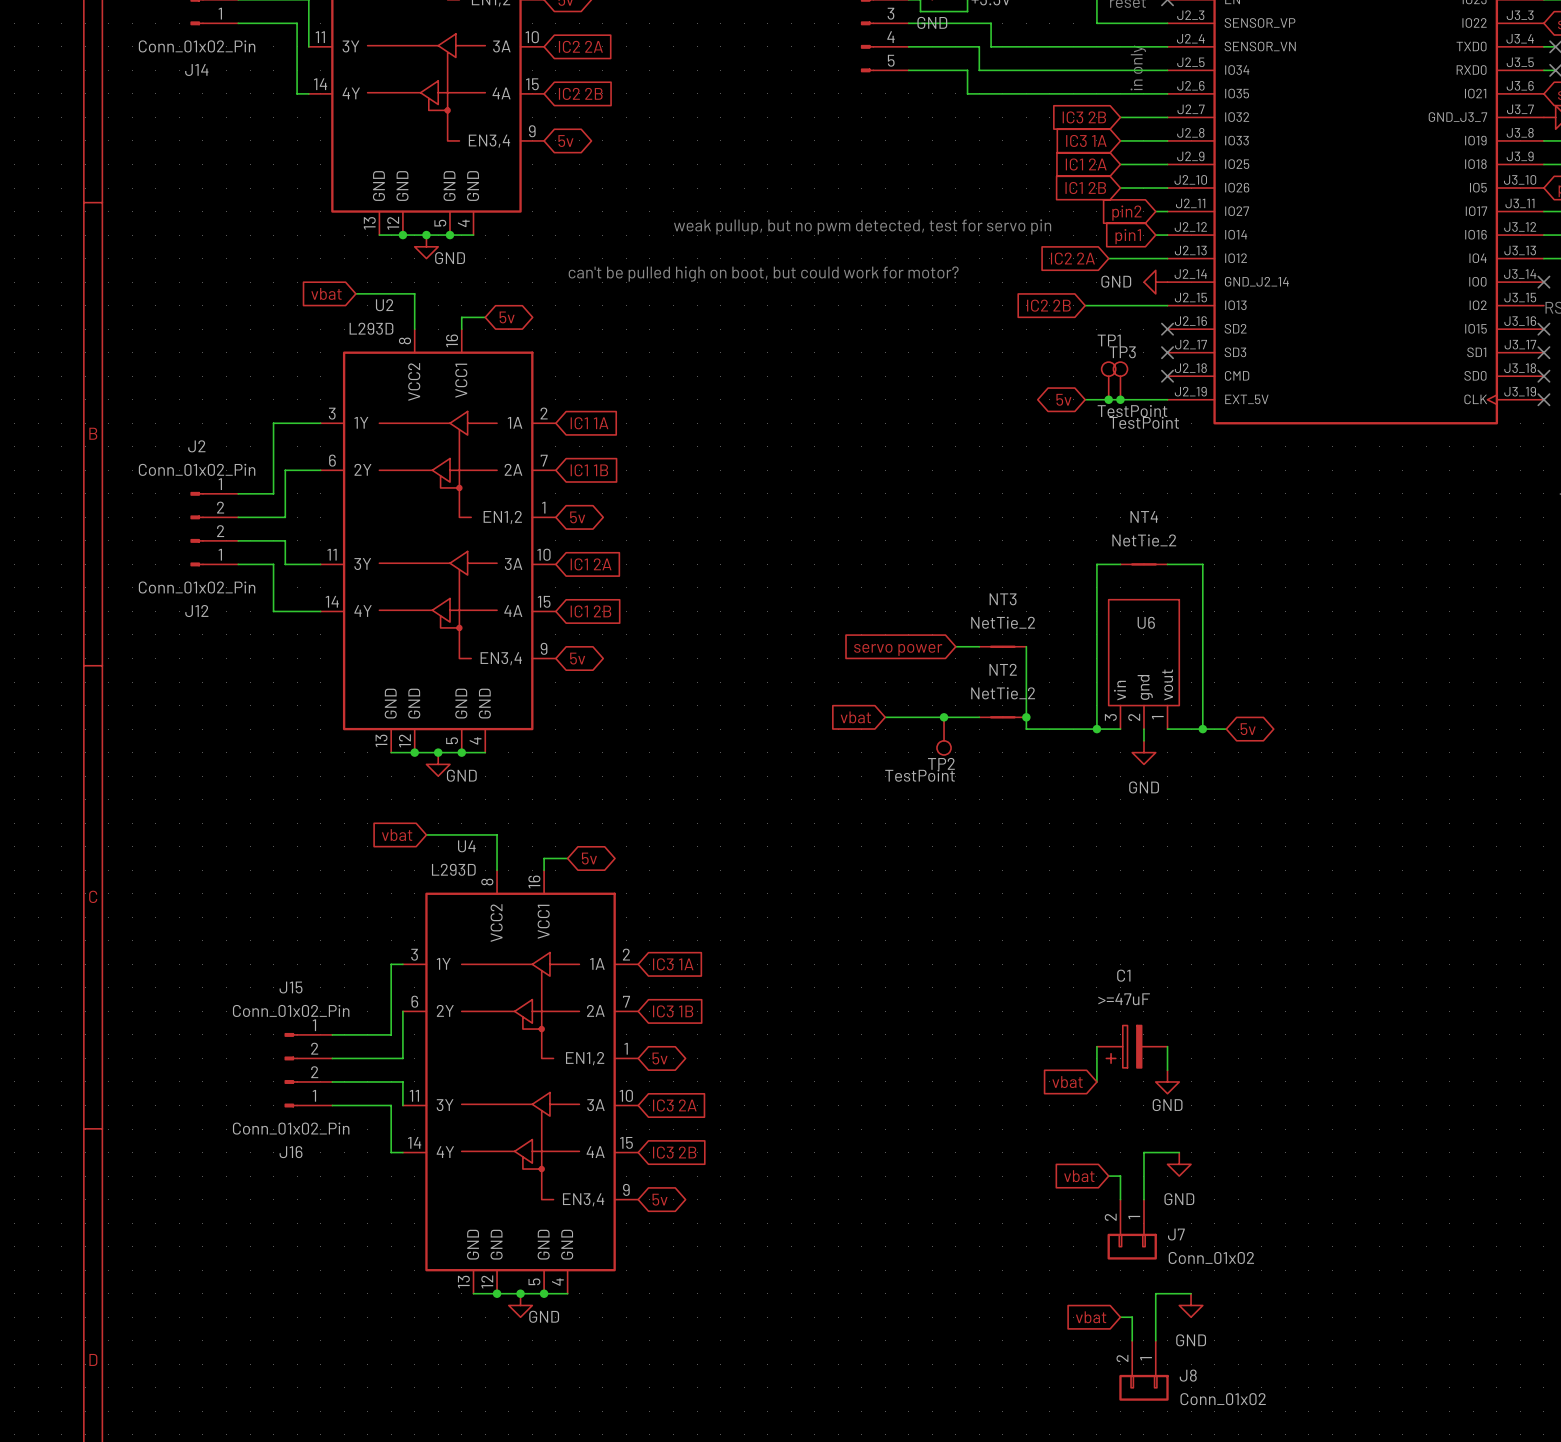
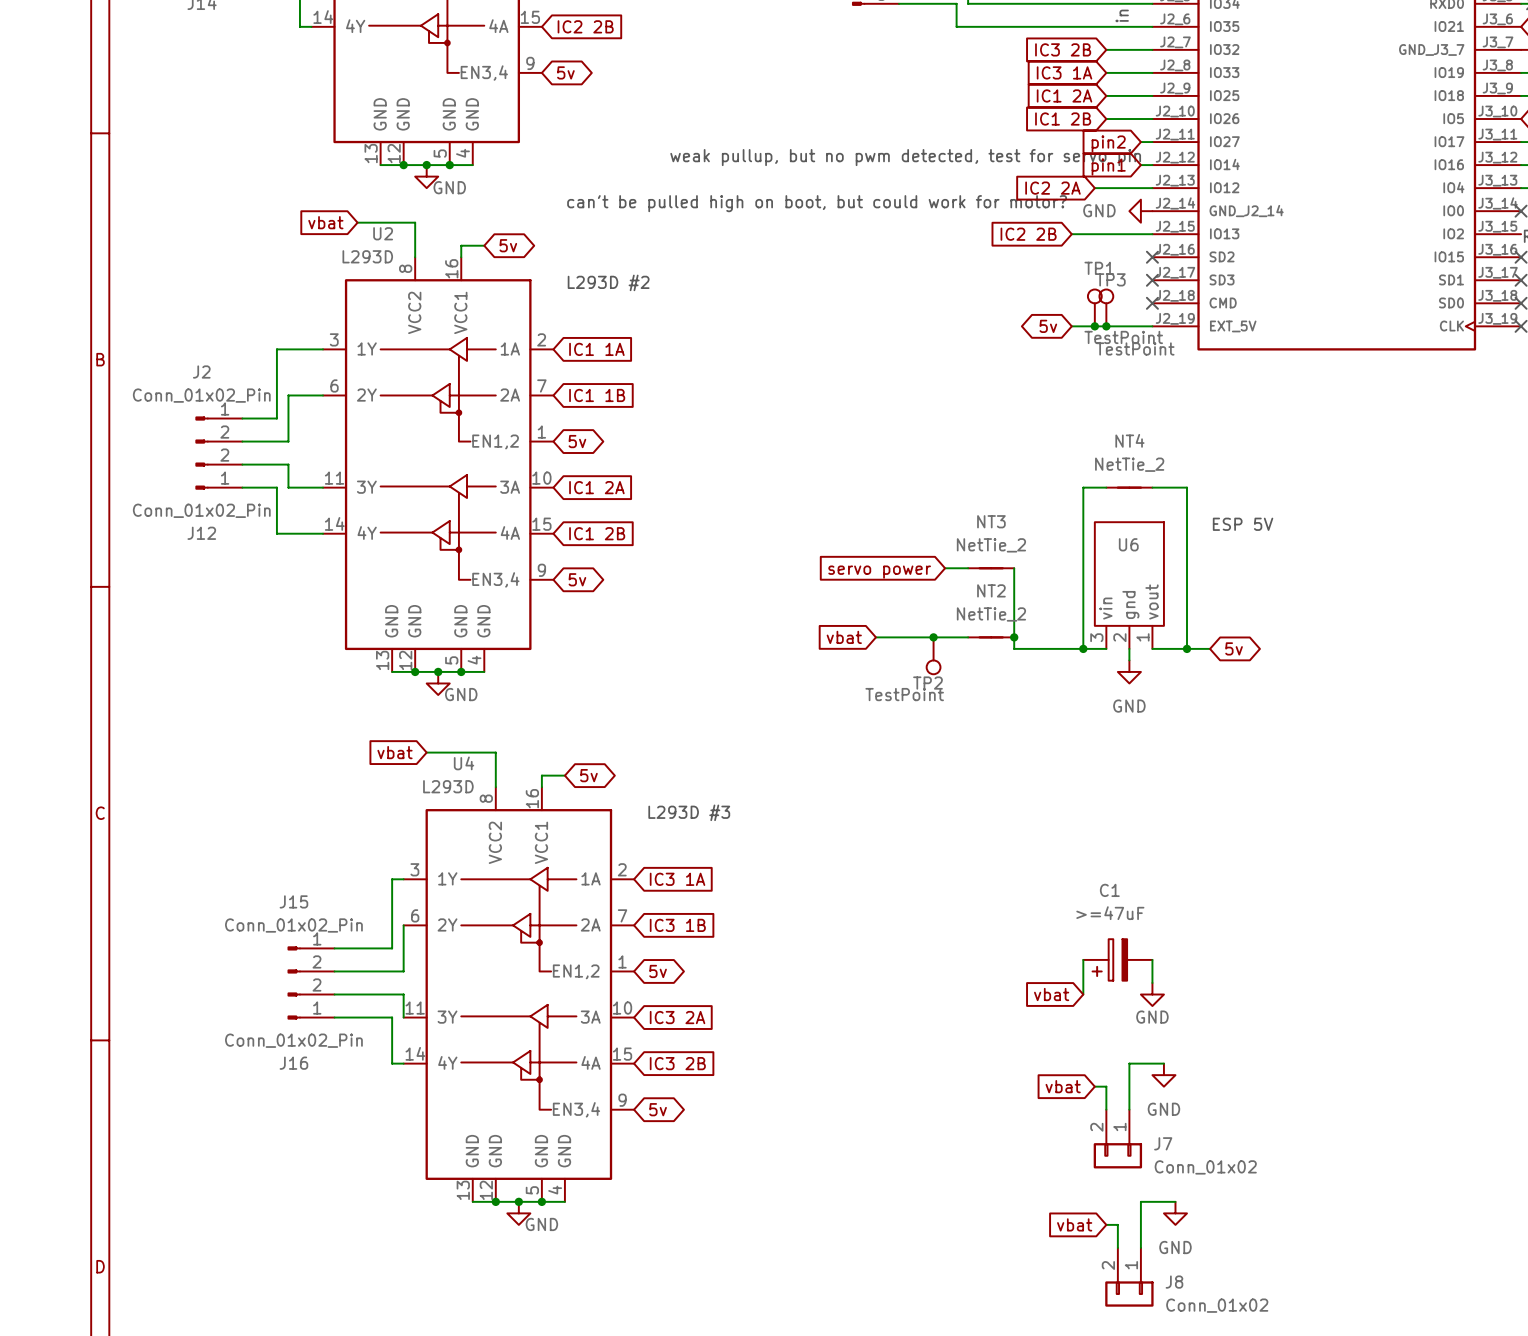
text: none -> L293D #2 (608, 282)
text: none -> ESP 5V (1243, 524)
text: none -> L293D #3 (689, 812)

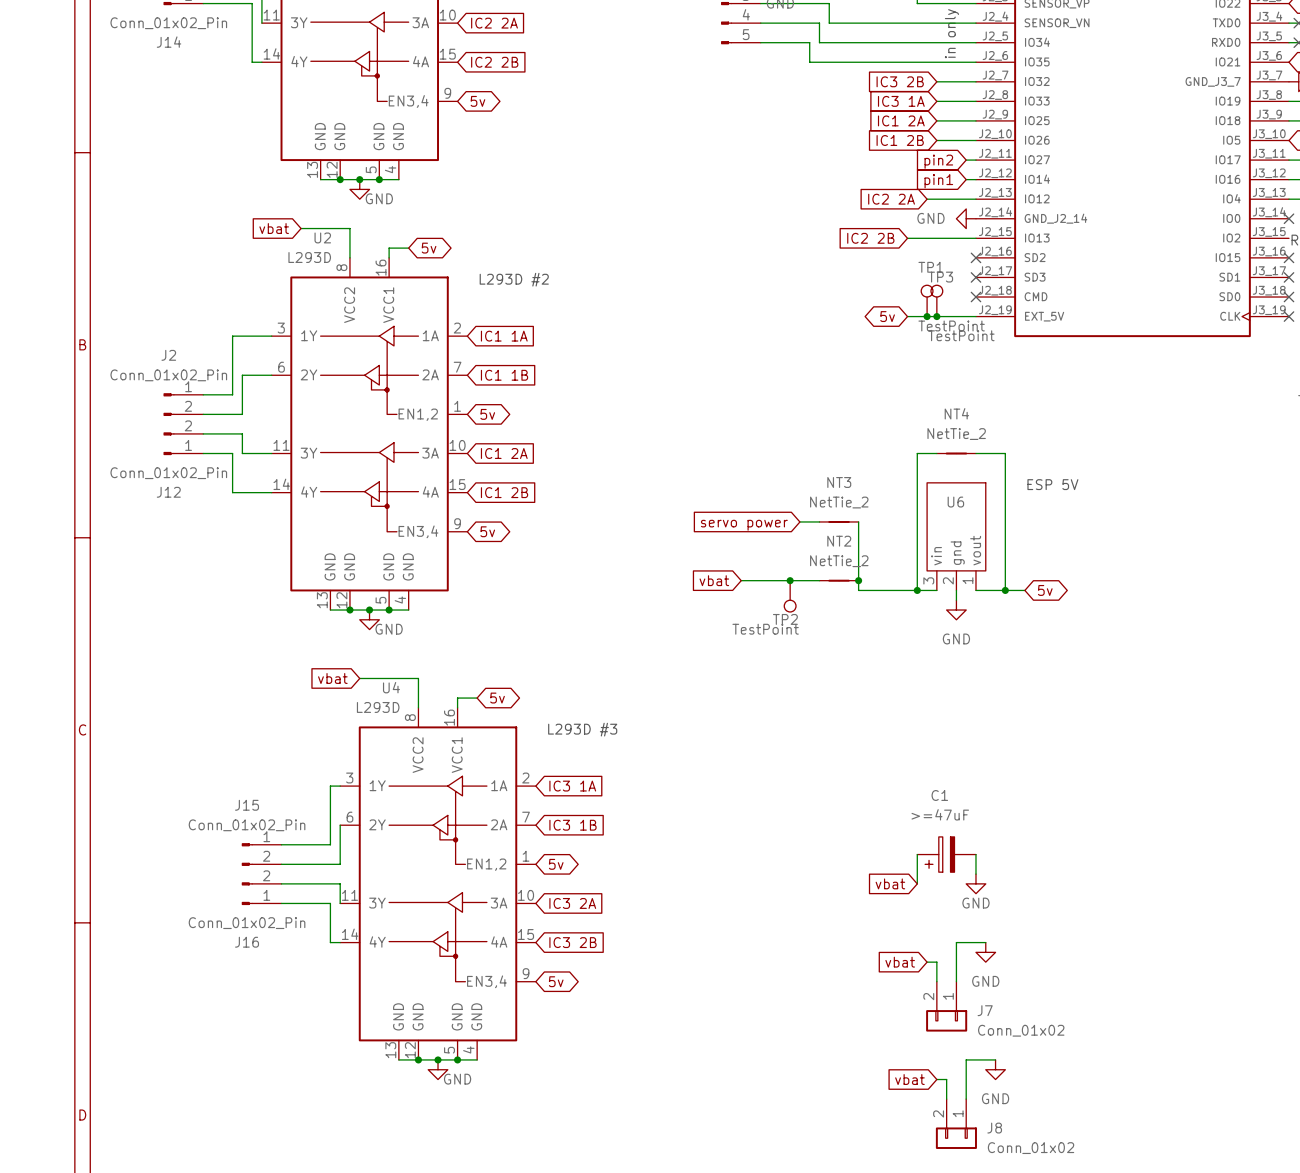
text: weak pullup, but no pwm detected, test for servo pin (905, 157) -> none
text: can't be pulled high on boot, but could work for motor? (817, 203) -> none

